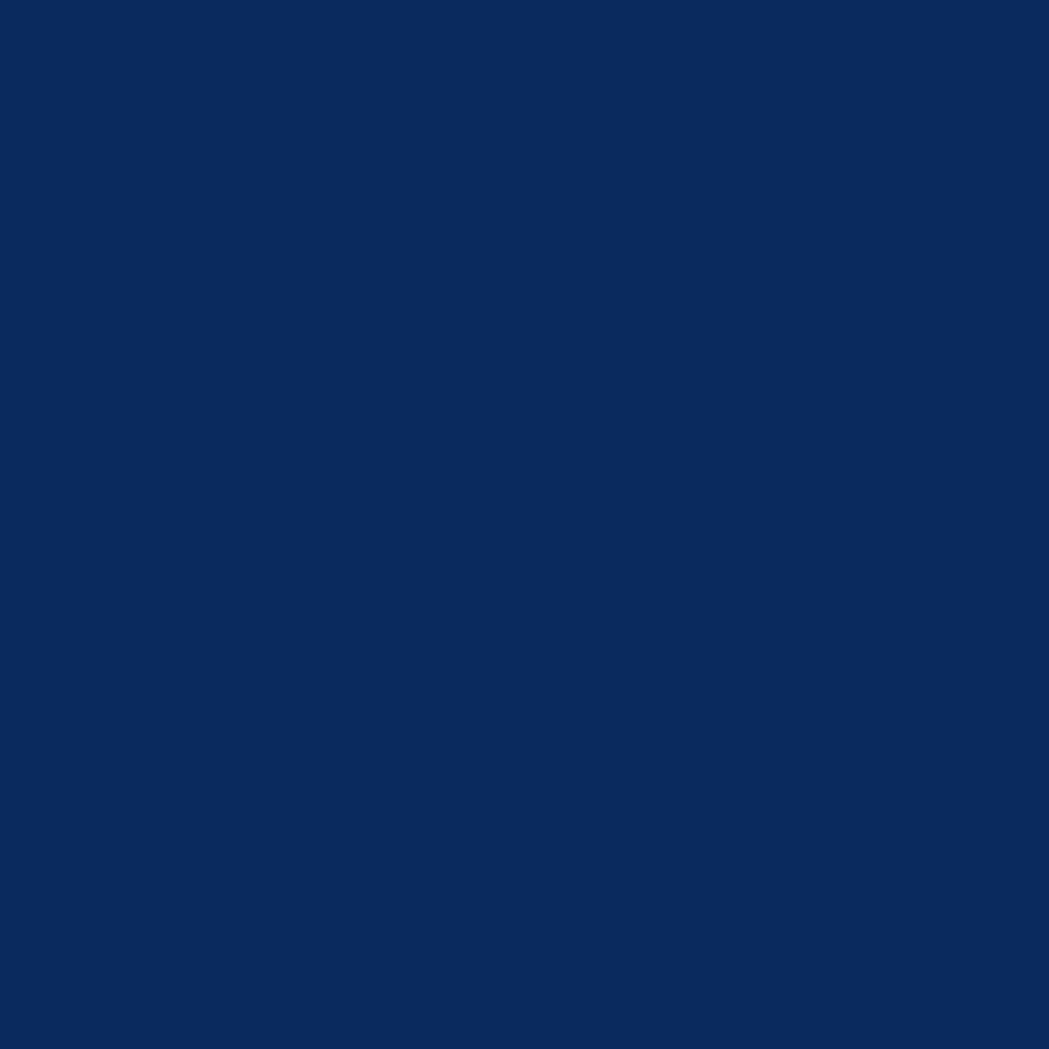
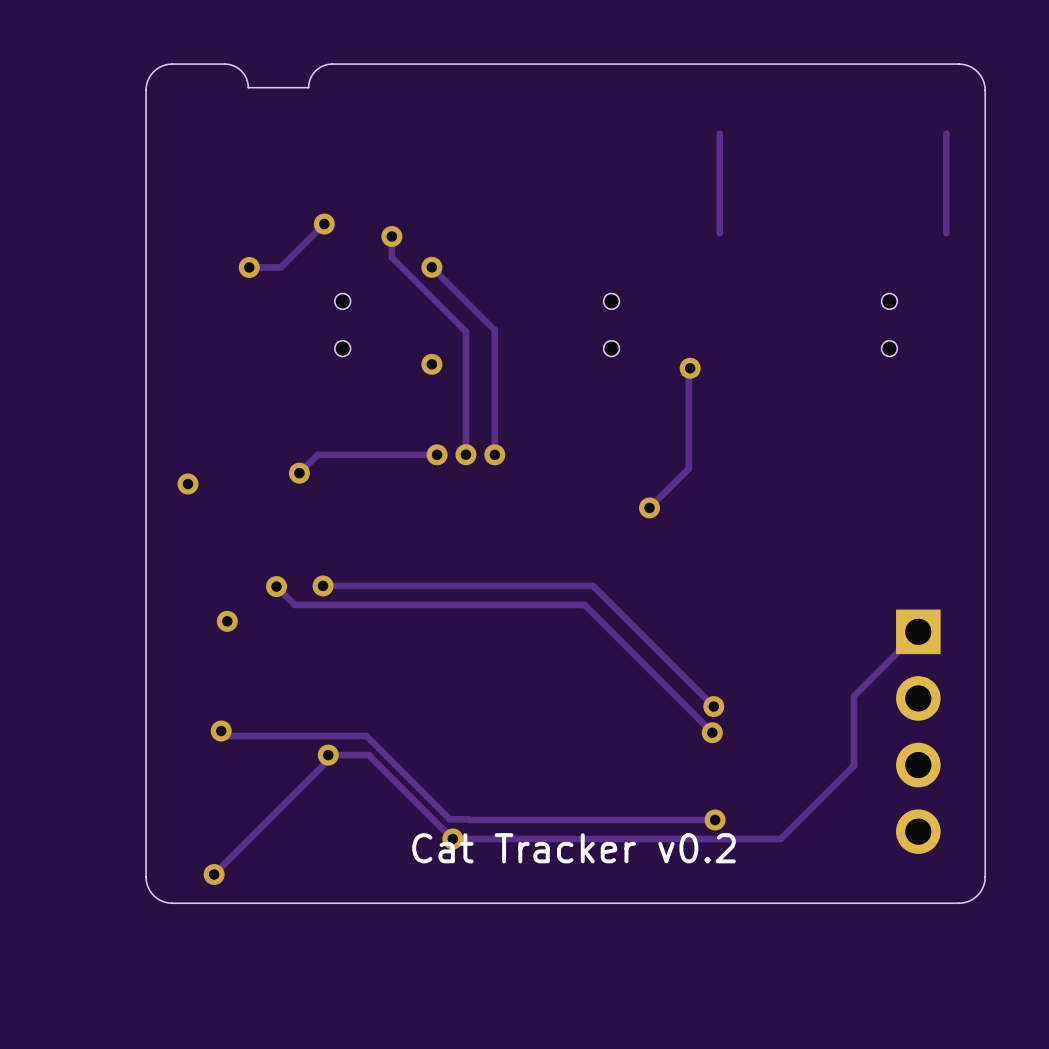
board edge: none -> (958, 64) (332, 64) (323, 65) (315, 70) (310, 78) (308, 87) (248, 87) (243, 73) (236, 67) (227, 64) (168, 64) (153, 71) (148, 80) (146, 90) (146, 877) (148, 887) (153, 895) (162, 901) (172, 903) (958, 903) (969, 901) (977, 895) (983, 887) (985, 877) (985, 90) (983, 80) (977, 71) (969, 66) (958, 64)
track: none -> (719, 133) (719, 233)
track: none -> (946, 133) (946, 233)
track: none -> (324, 224) (280, 267) (249, 267)
via: none -> (324, 224)
track: none -> (391, 236) (391, 257) (465, 331) (465, 454)
via: none -> (391, 236)
via: none -> (249, 267)
track: none -> (431, 267) (494, 330) (494, 454)
via: none -> (431, 267)
part: none -> (342, 325)
part: none -> (611, 325)
part: none -> (889, 325)
via: none -> (431, 364)
track: none -> (690, 368) (688, 468) (649, 507)
via: none -> (690, 368)
track: none -> (437, 454) (317, 454) (299, 473)
via: none -> (437, 454)
via: none -> (465, 454)
via: none -> (494, 454)
via: none -> (299, 473)
via: none -> (187, 483)
via: none -> (649, 507)
track: none -> (323, 585) (593, 585) (713, 706)
via: none -> (323, 585)
track: none -> (276, 586) (294, 604) (584, 604) (712, 732)
via: none -> (276, 586)
via: none -> (227, 621)
track: none -> (918, 631) (854, 696) (854, 765) (780, 839) (452, 839) (368, 755) (328, 755) (328, 760) (214, 874)
via: none -> (713, 706)
track: none -> (221, 731) (226, 736) (366, 736) (449, 819) (715, 819)
via: none -> (221, 731)
part: none -> (918, 731)
via: none -> (712, 732)
via: none -> (328, 755)
via: none -> (715, 819)
via: none -> (452, 839)
text: none -> Cat Tracker v0.2 (574, 848)
via: none -> (214, 874)

